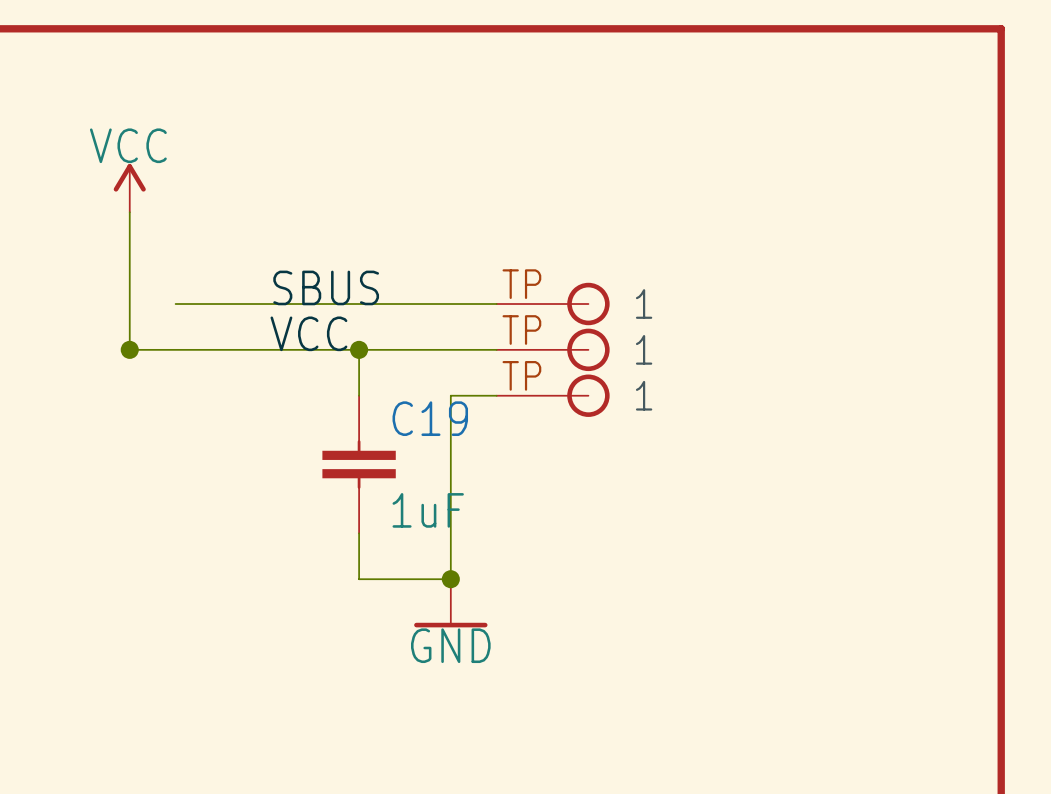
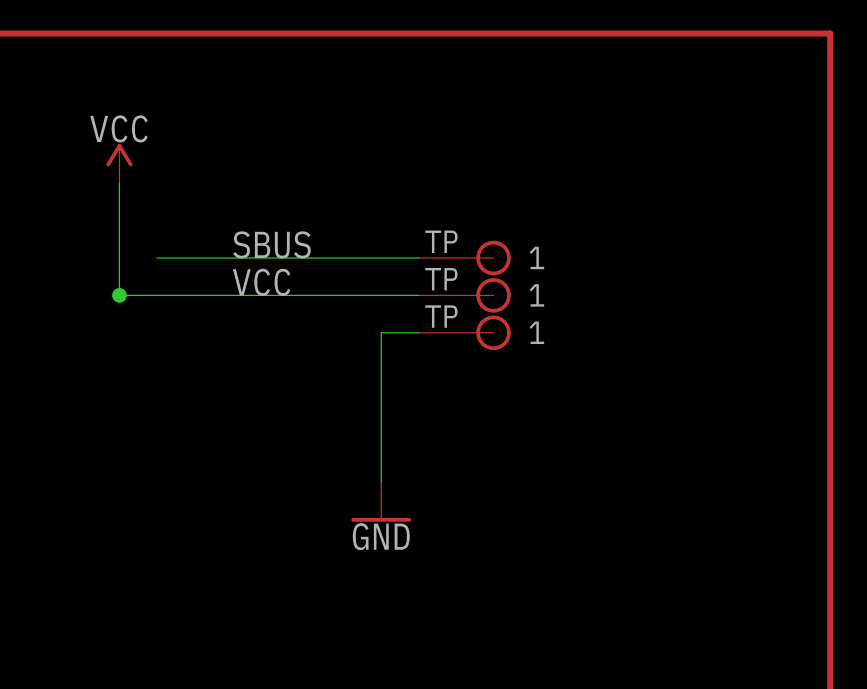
wire: (359, 349) (359, 395) -> none
junction: (359, 349) -> none
C19: 1uF (359, 464) -> none
wire: (359, 533) (359, 579) (450, 579) -> none
junction: (450, 579) -> none

